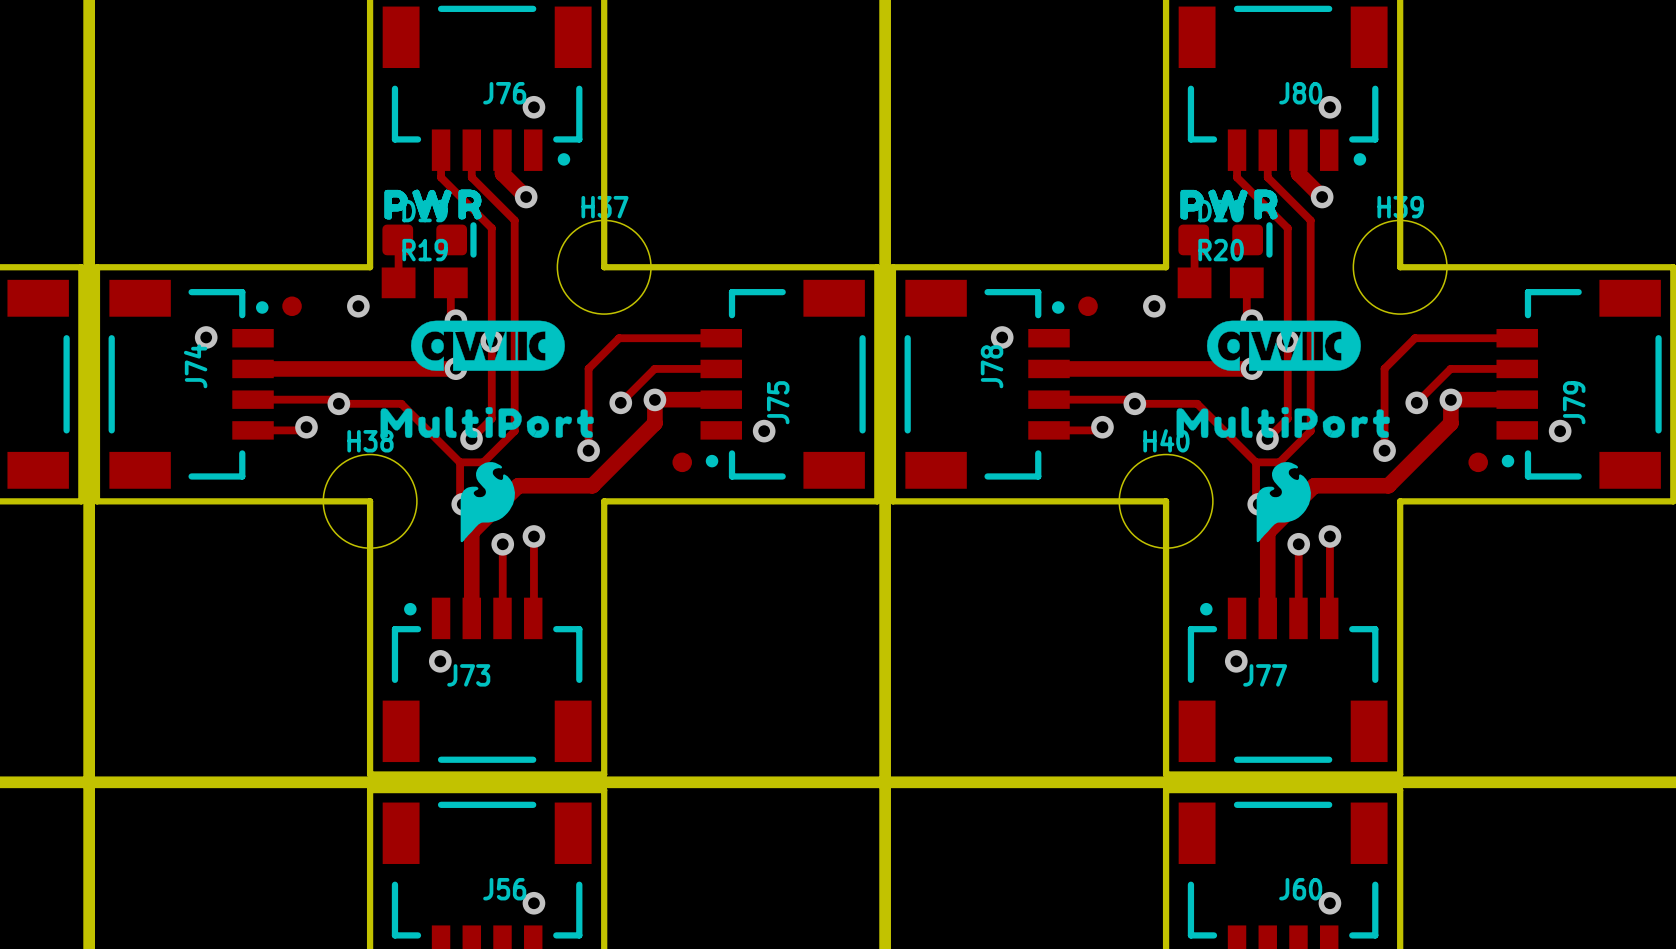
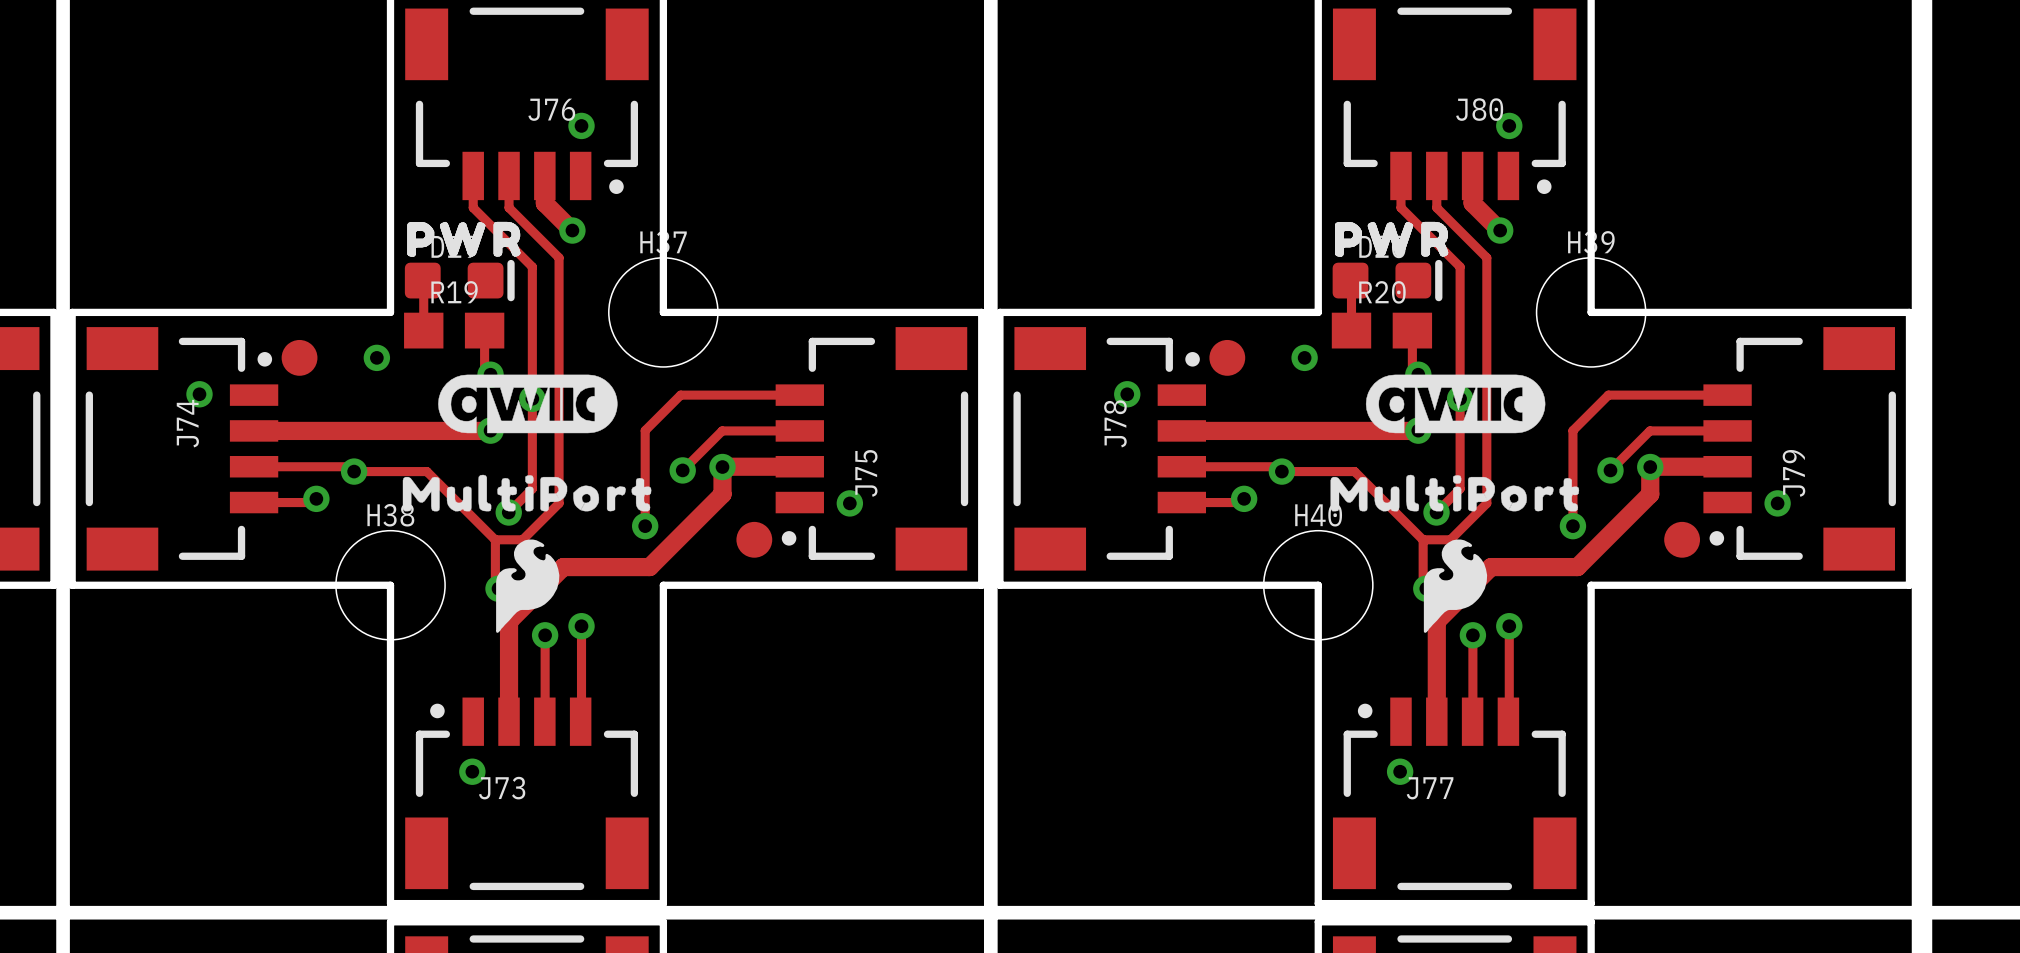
part footprint: [282, 296, 302, 317] -> [281, 339, 318, 376]
part footprint: [1078, 296, 1098, 317] -> [1209, 339, 1246, 376]
part footprint: [672, 452, 692, 473] -> [736, 521, 773, 558]
part footprint: [1468, 452, 1488, 473] -> [1664, 521, 1701, 558]

